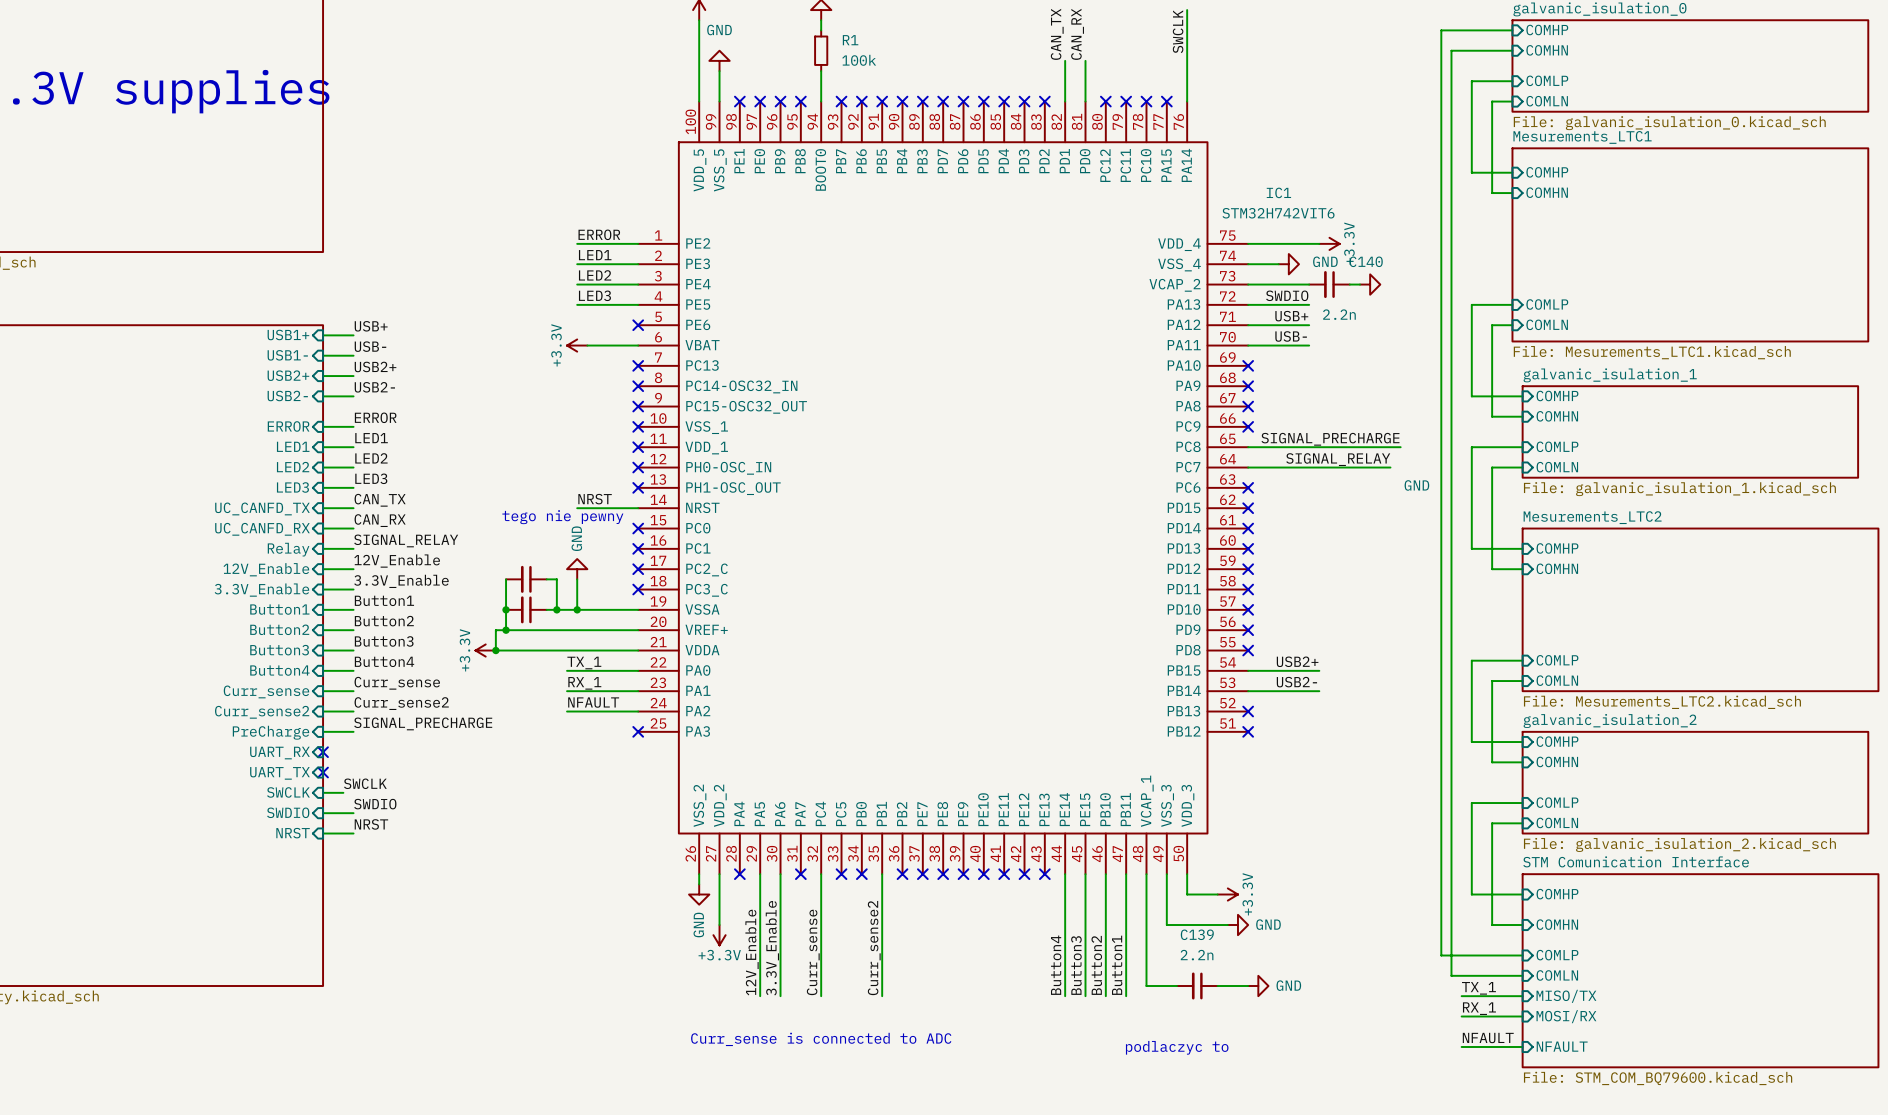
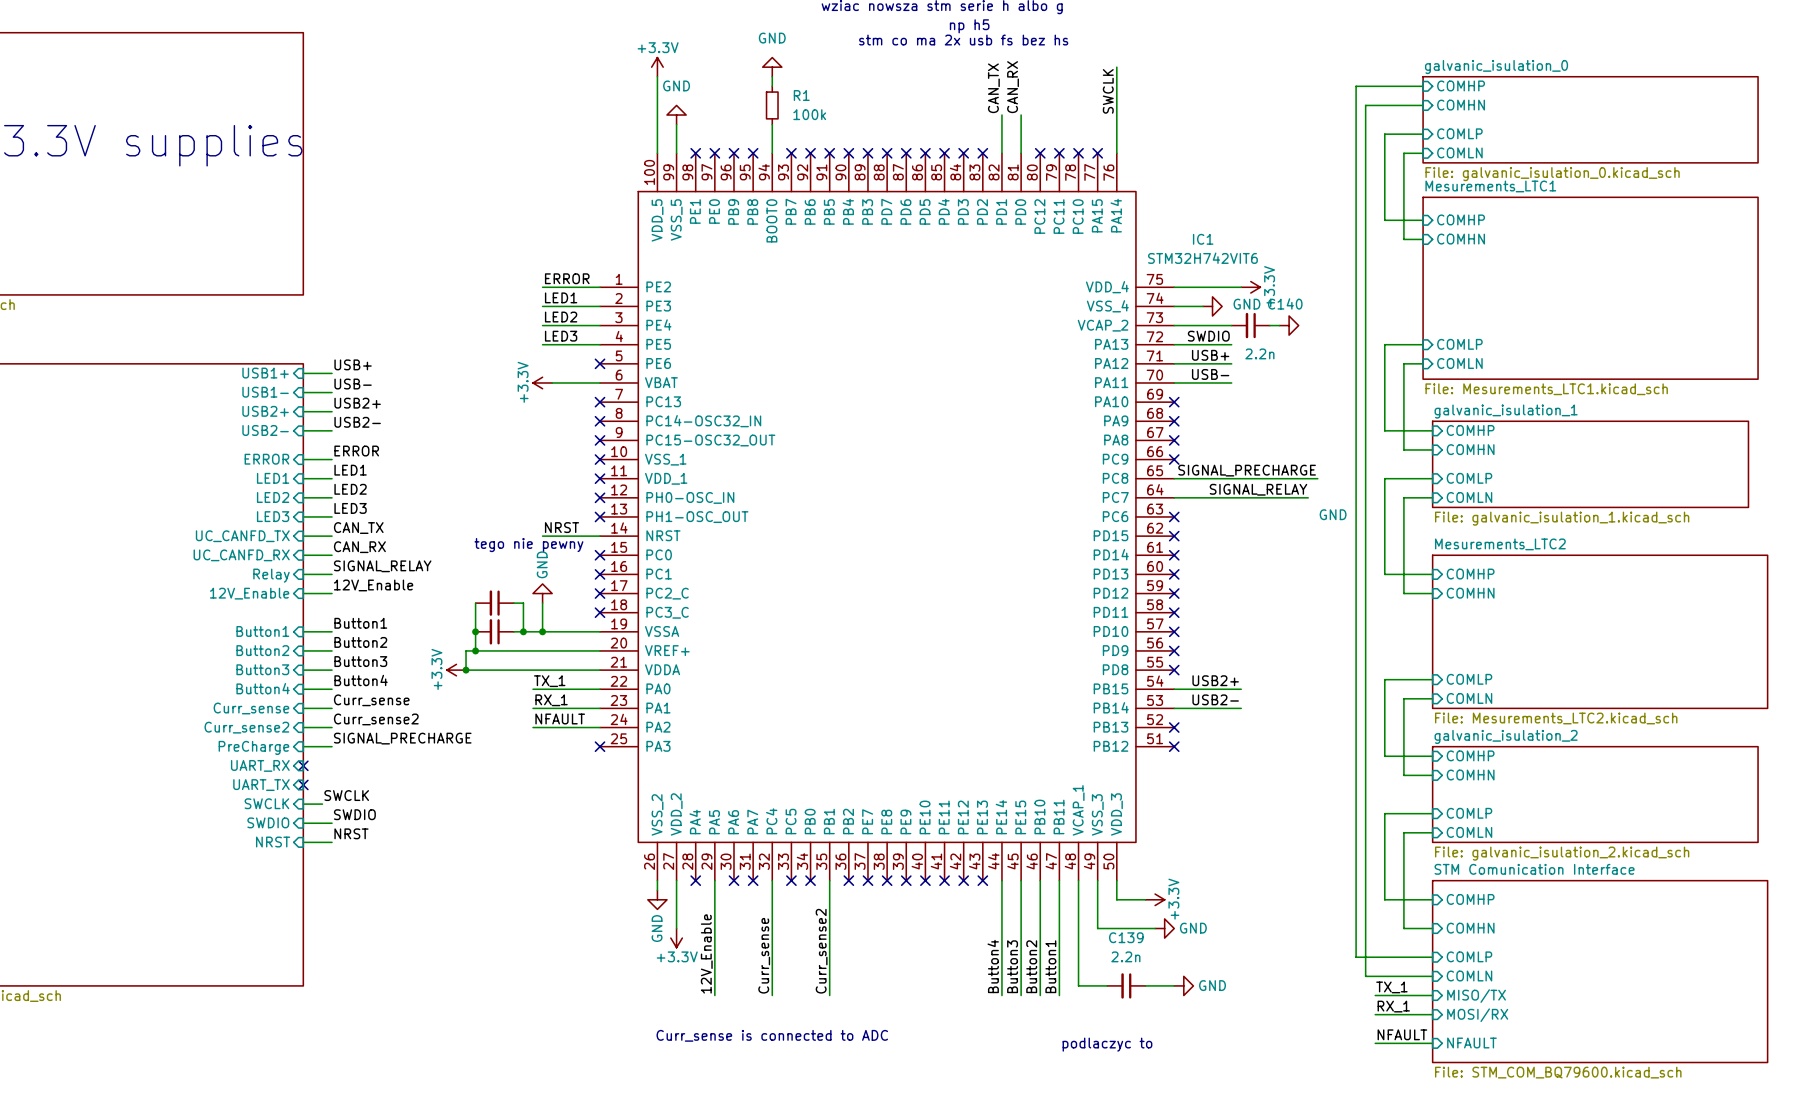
label: 3.3V_Enable (401, 581) -> none
wire: (323, 589) (353, 589) -> none
sheet pin: 3.3V_Enable (261, 590) -> none
wire: (780, 874) (780, 996) -> none
no-connect mark: none -> (733, 880)
label: 3.3V_Enable (772, 948) -> none

